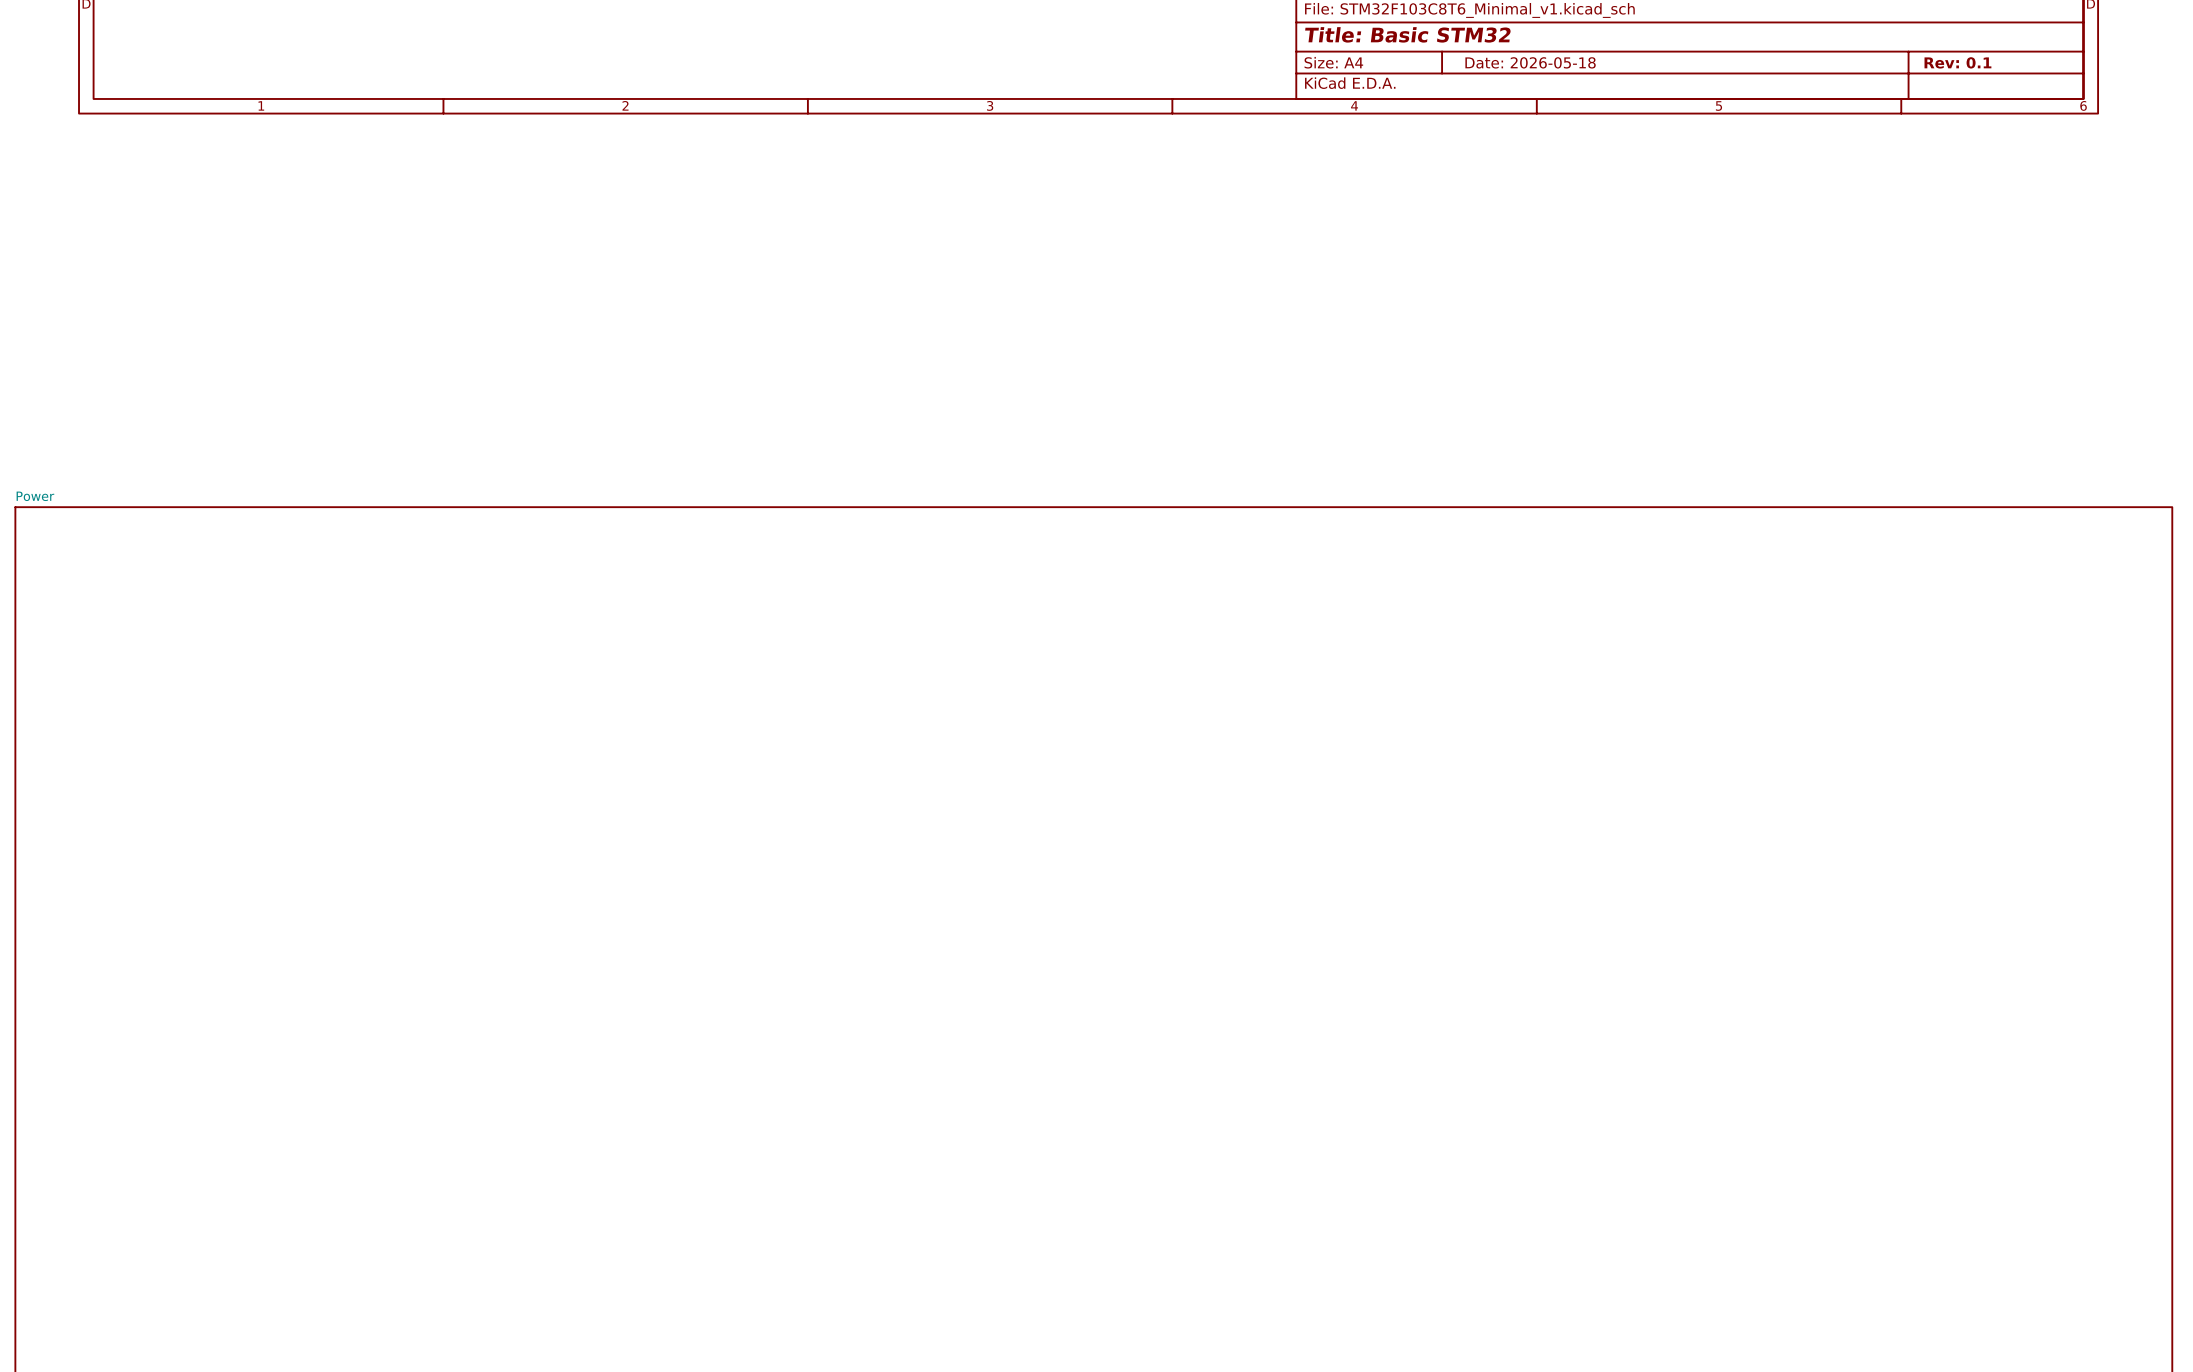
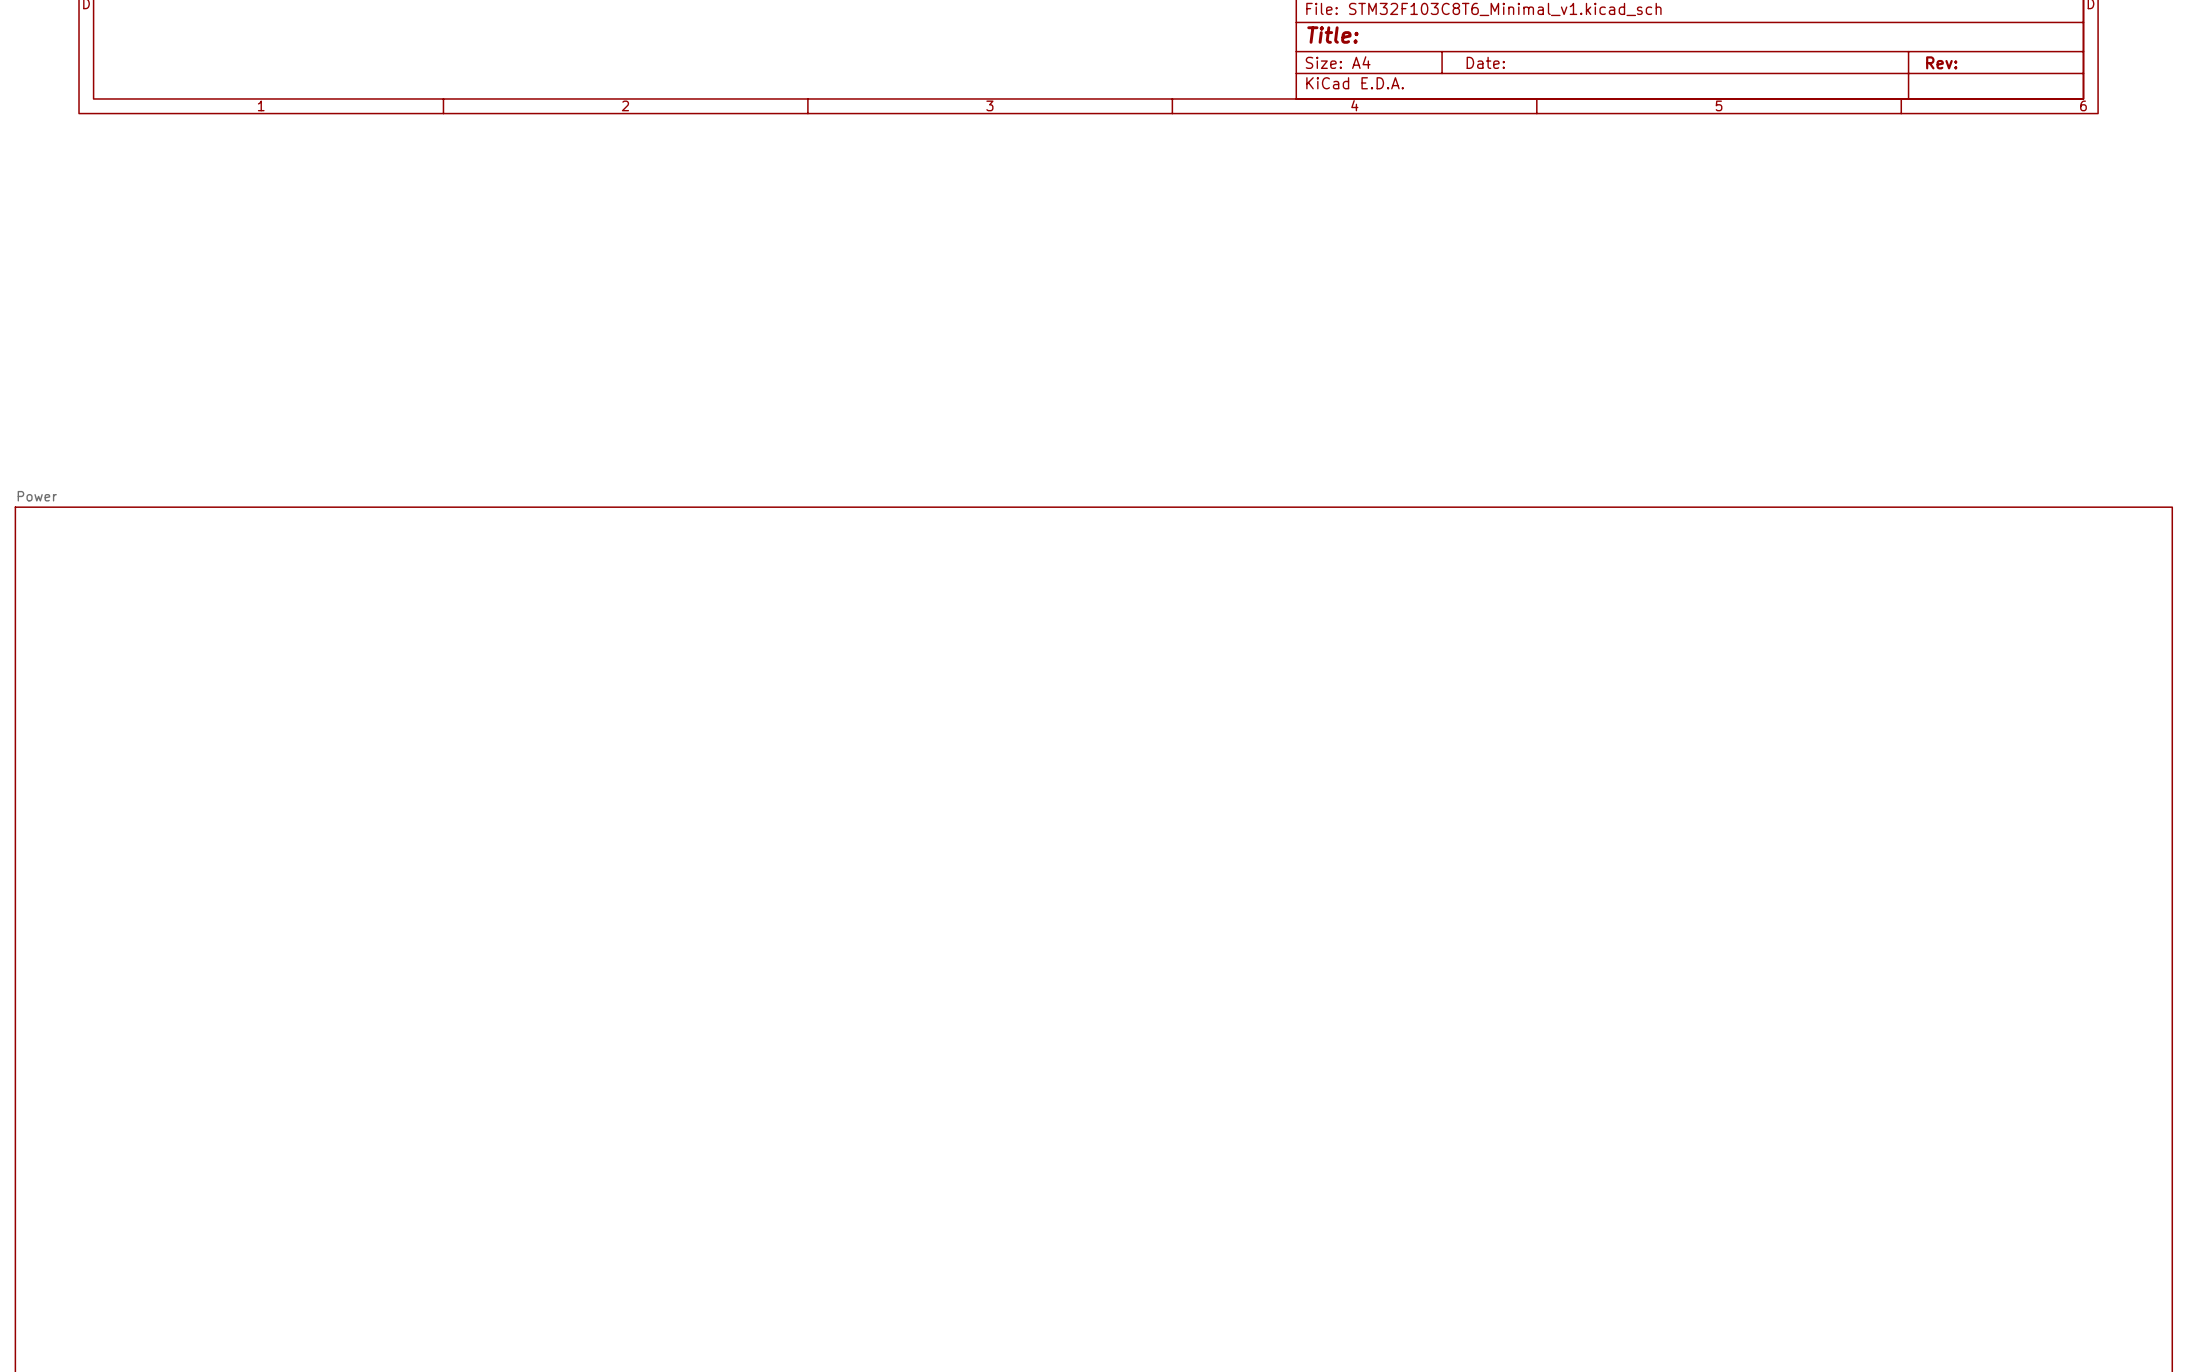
title block: Title: Basic STM32 (1407, 34) -> Title: (1332, 35)
title block: Date: 2026-05-18 (1530, 62) -> Date: (1485, 62)
title block: Rev: 0.1 (1957, 62) -> Rev: (1941, 62)

